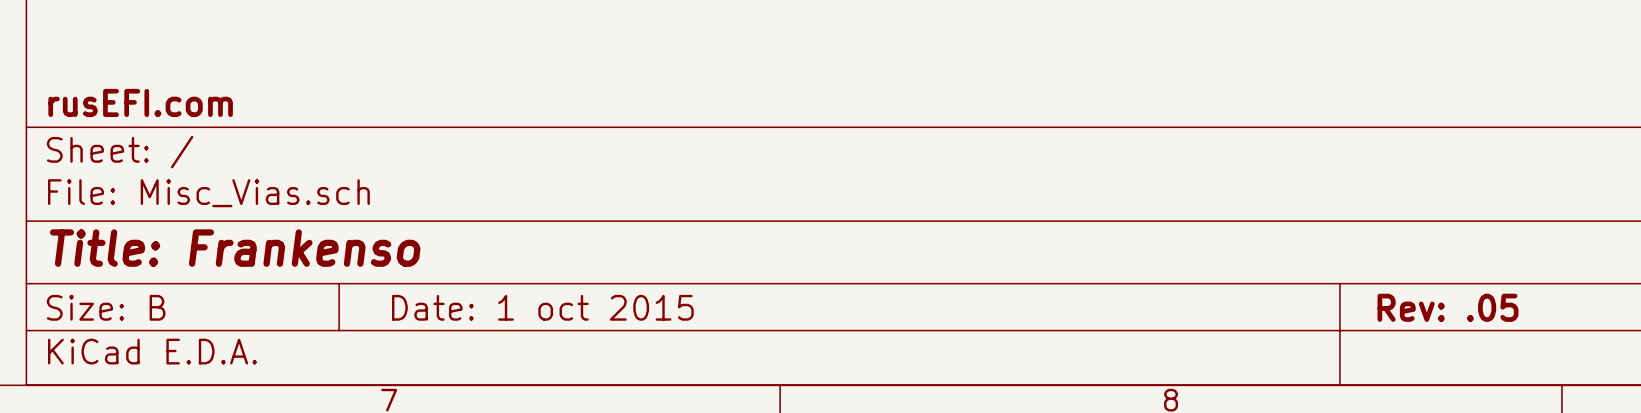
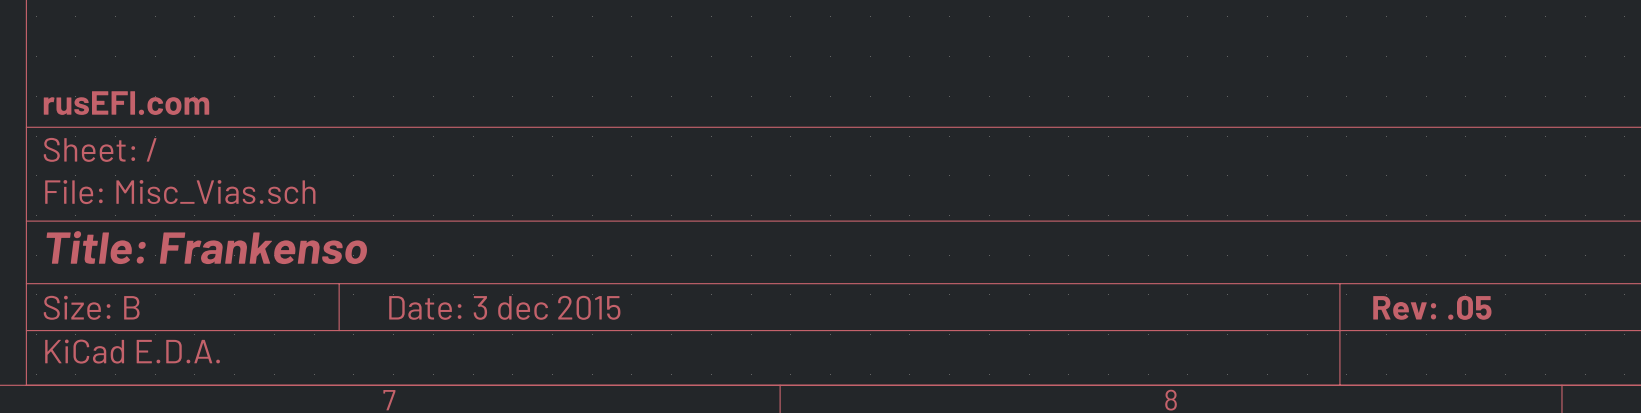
title block: Date: 1 oct 2015 (542, 307) -> Date: 3 dec 2015 (504, 307)

